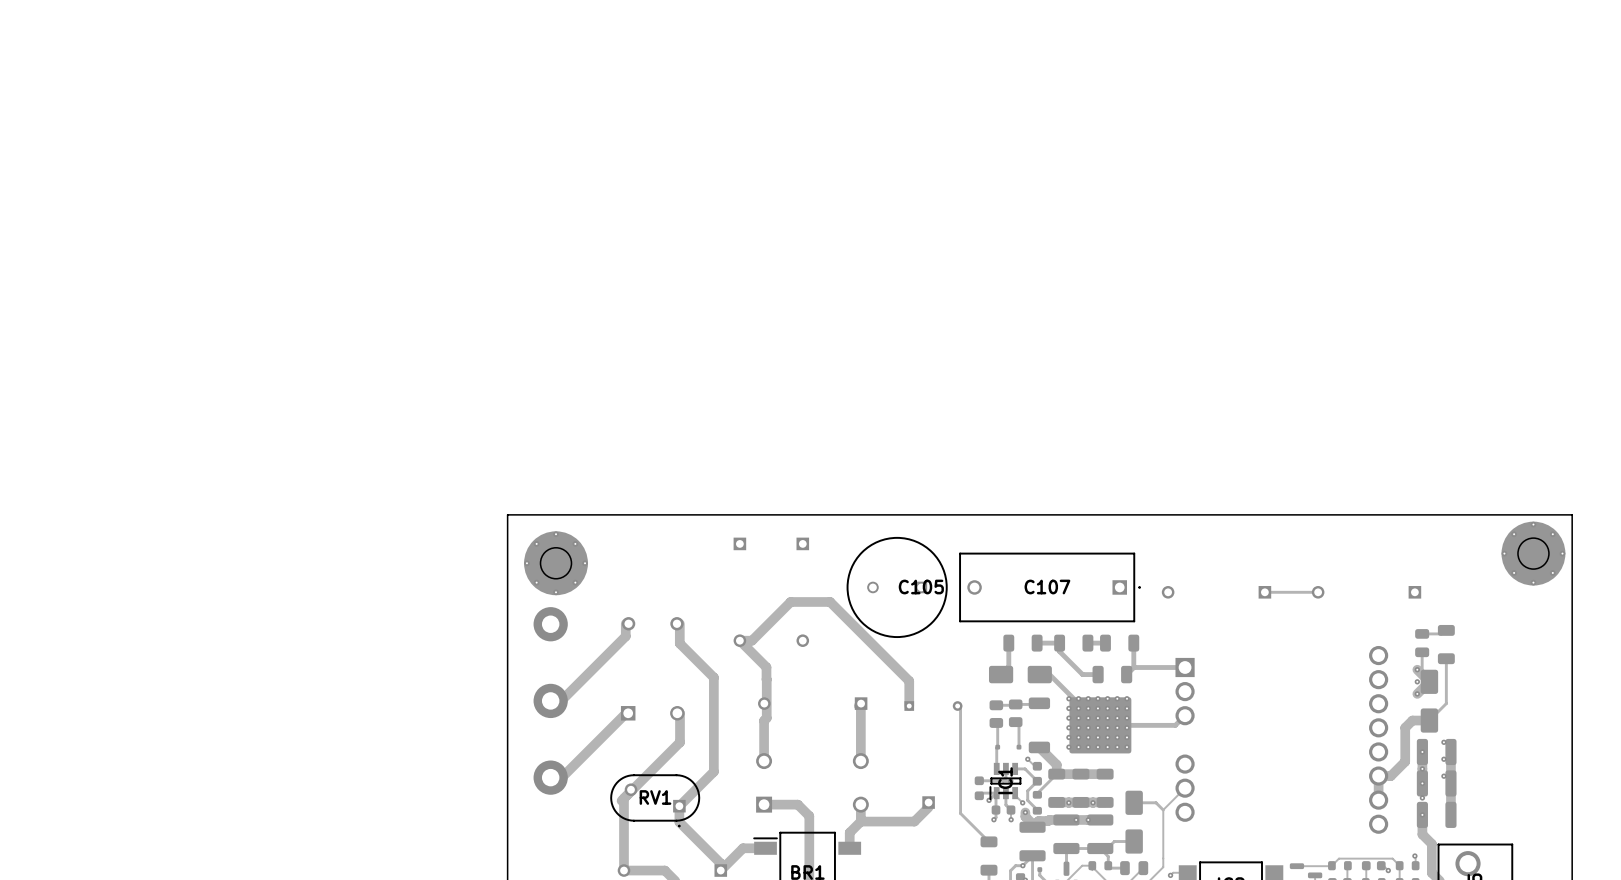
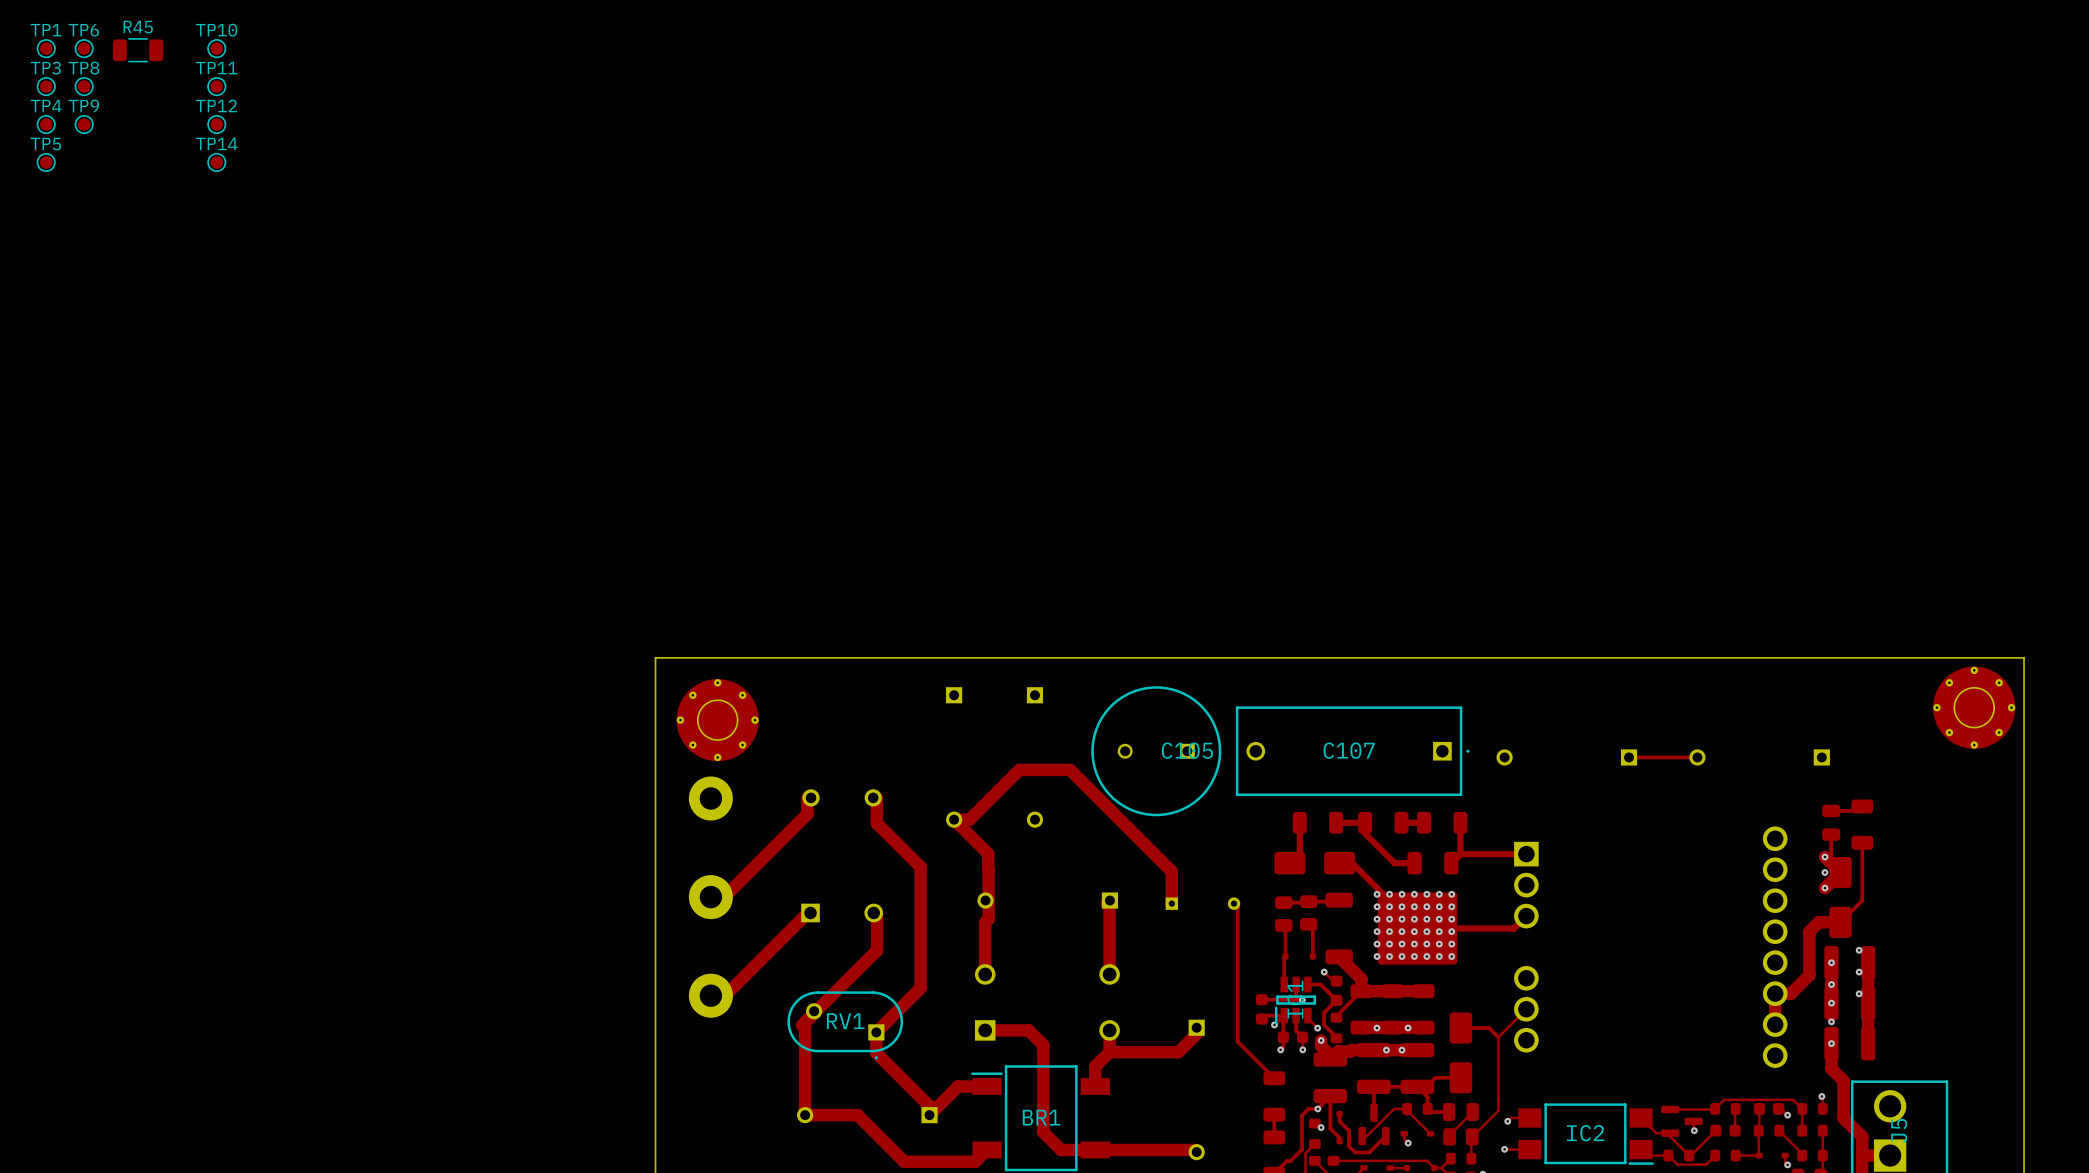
TP1: none -> (46, 48)
TP6: none -> (84, 48)
TP10: none -> (216, 48)
R45: none -> (138, 50)
TP3: none -> (46, 86)
TP8: none -> (84, 86)
TP11: none -> (216, 86)
TP4: none -> (46, 124)
TP9: none -> (84, 124)
TP12: none -> (216, 124)
TP5: none -> (46, 162)
TP14: none -> (216, 162)

